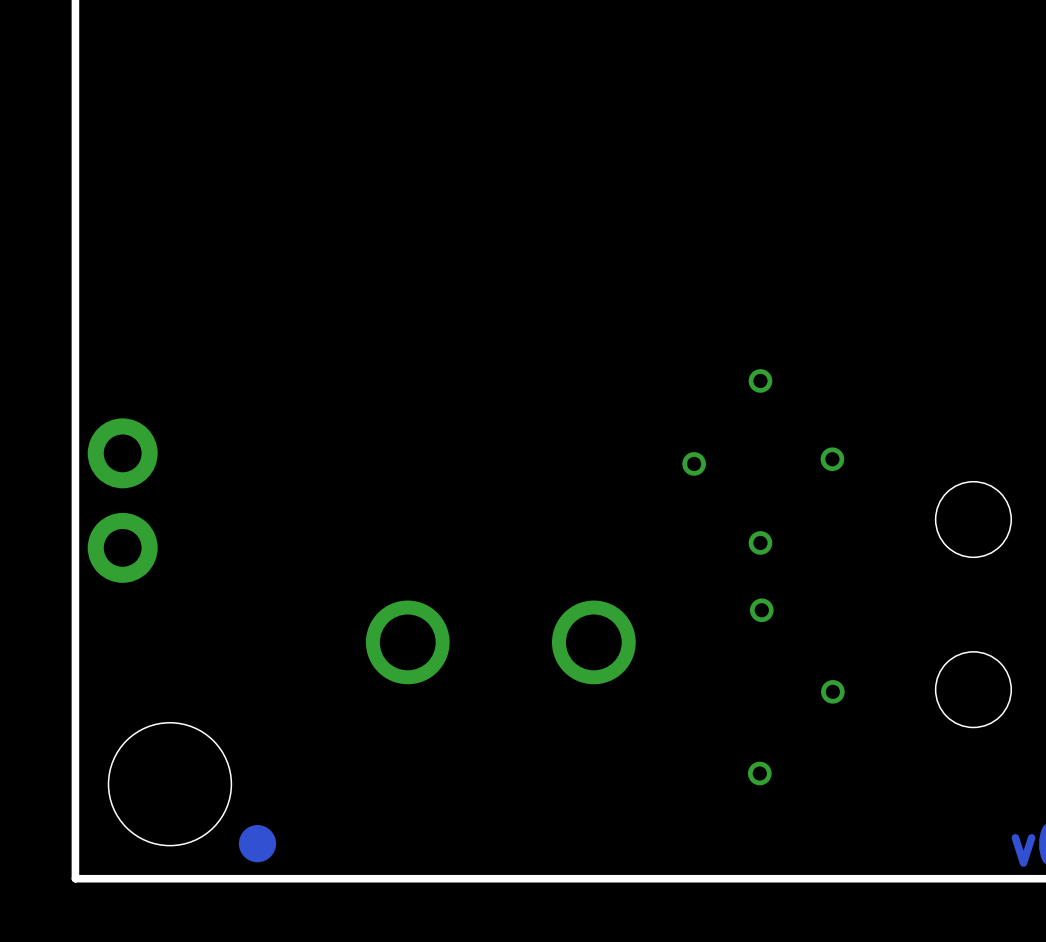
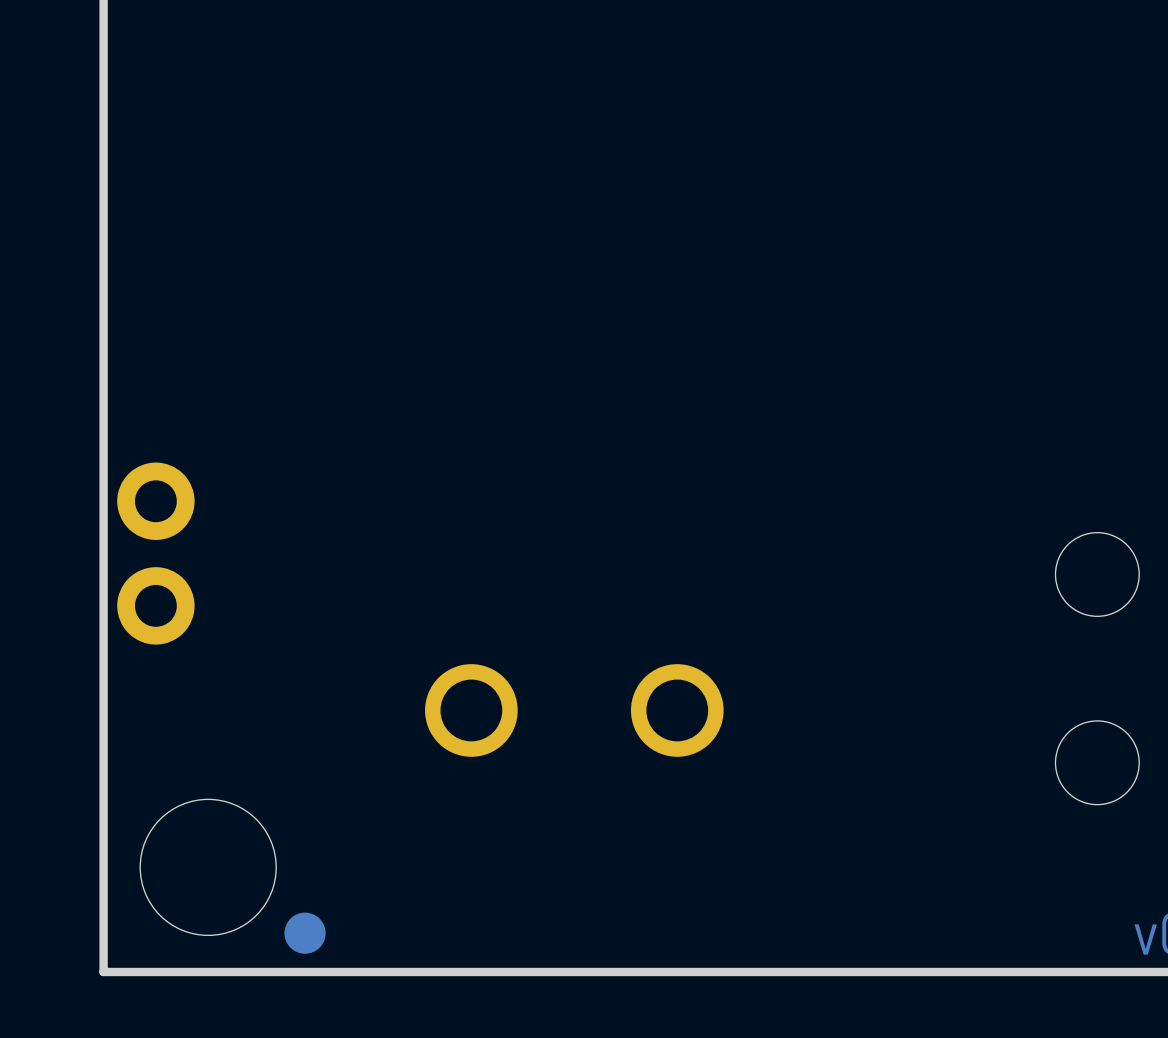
via: (760, 380) -> none
via: (832, 459) -> none
via: (694, 463) -> none
via: (760, 542) -> none
via: (761, 610) -> none
via: (832, 691) -> none
via: (759, 773) -> none

